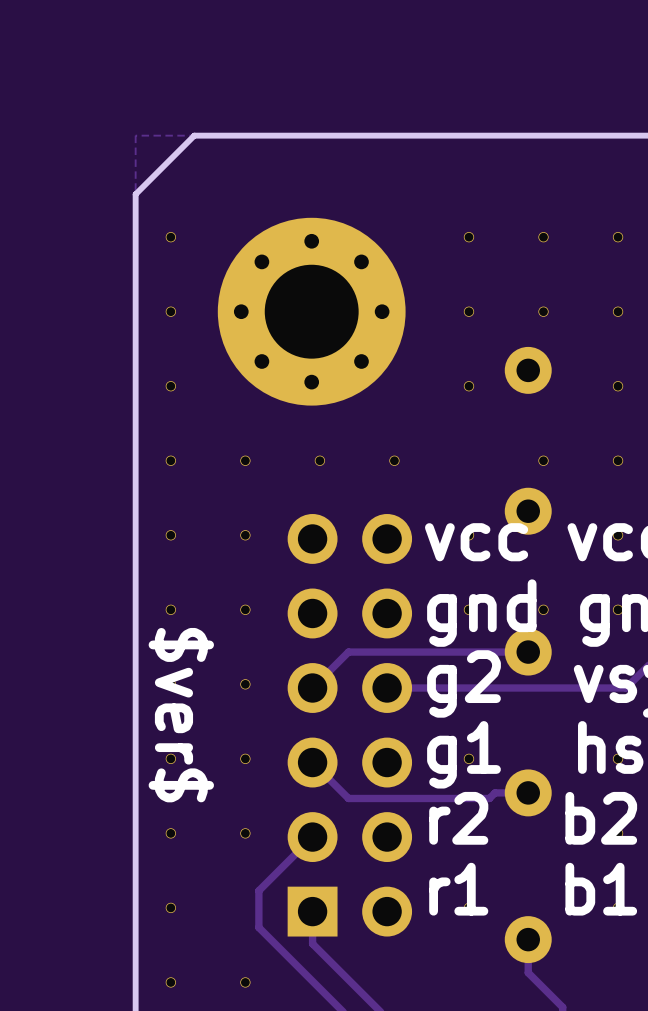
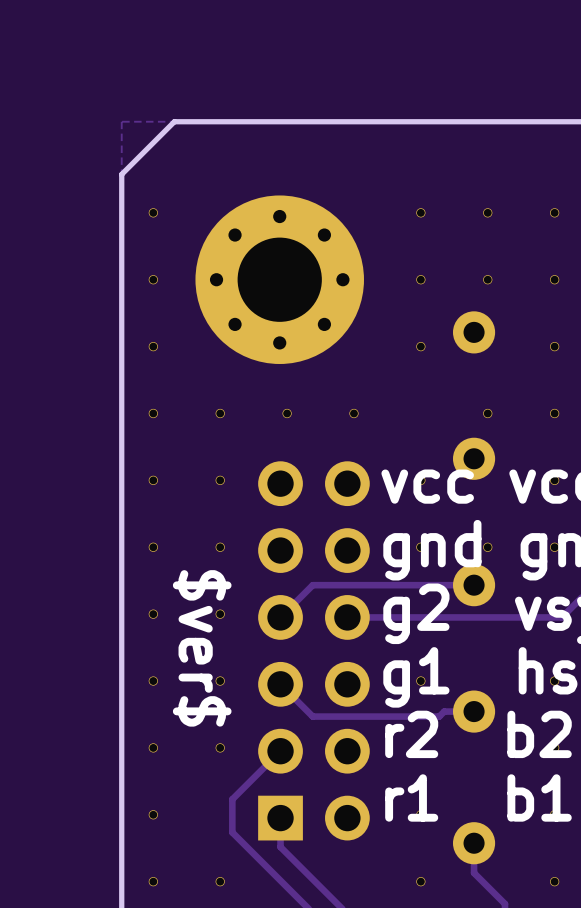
text position: $ver$ (181, 715) -> $ver$ (202, 648)
part: none -> (420, 881)
part: none -> (554, 881)

